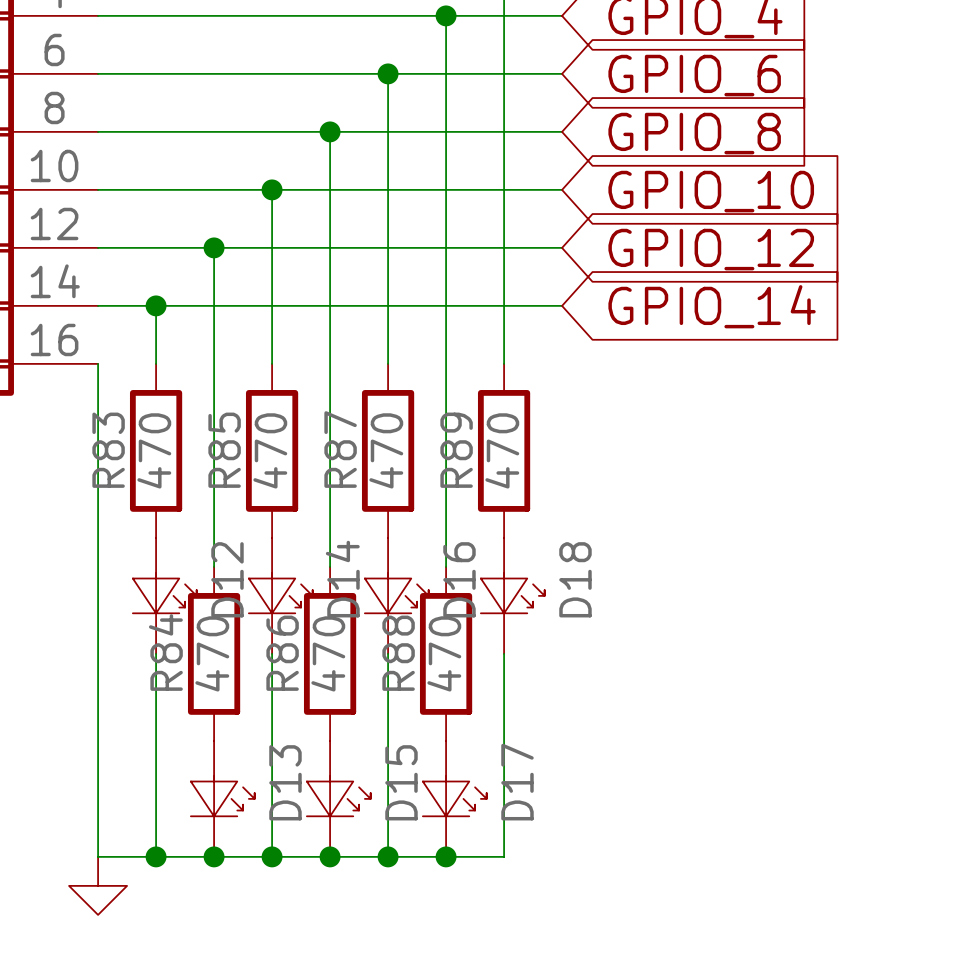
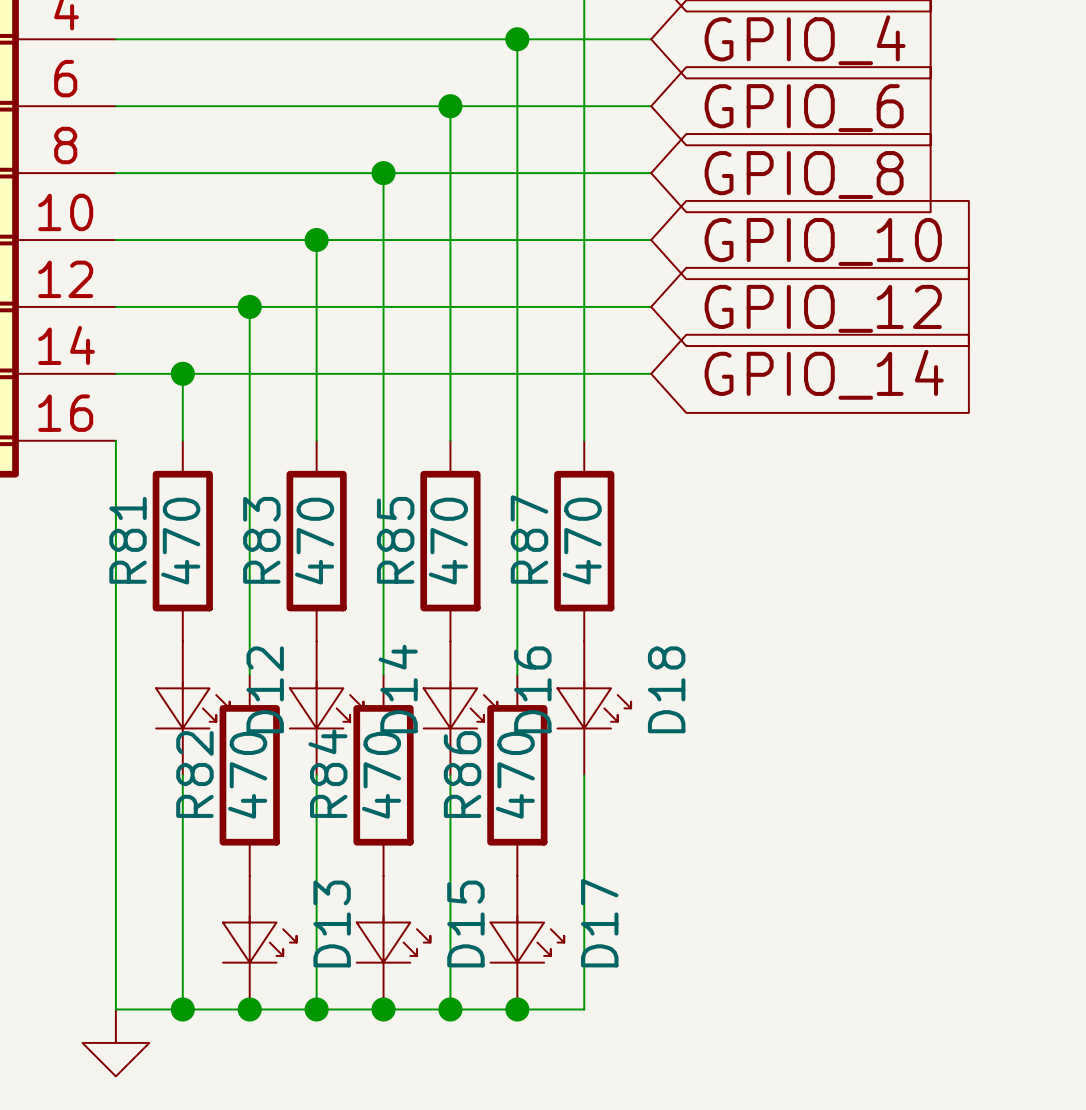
R87 name: R87 (340, 449) -> R85 (395, 540)
R83 name: R83 (108, 450) -> R81 (128, 540)
R85 name: R85 (224, 450) -> R83 (261, 540)
R89 name: R89 (456, 450) -> R87 (529, 539)
R84 name: R84 (165, 652) -> R82 (194, 774)
R86 name: R86 (282, 653) -> R84 (327, 773)
R88 name: R88 (398, 653) -> R86 (462, 774)

